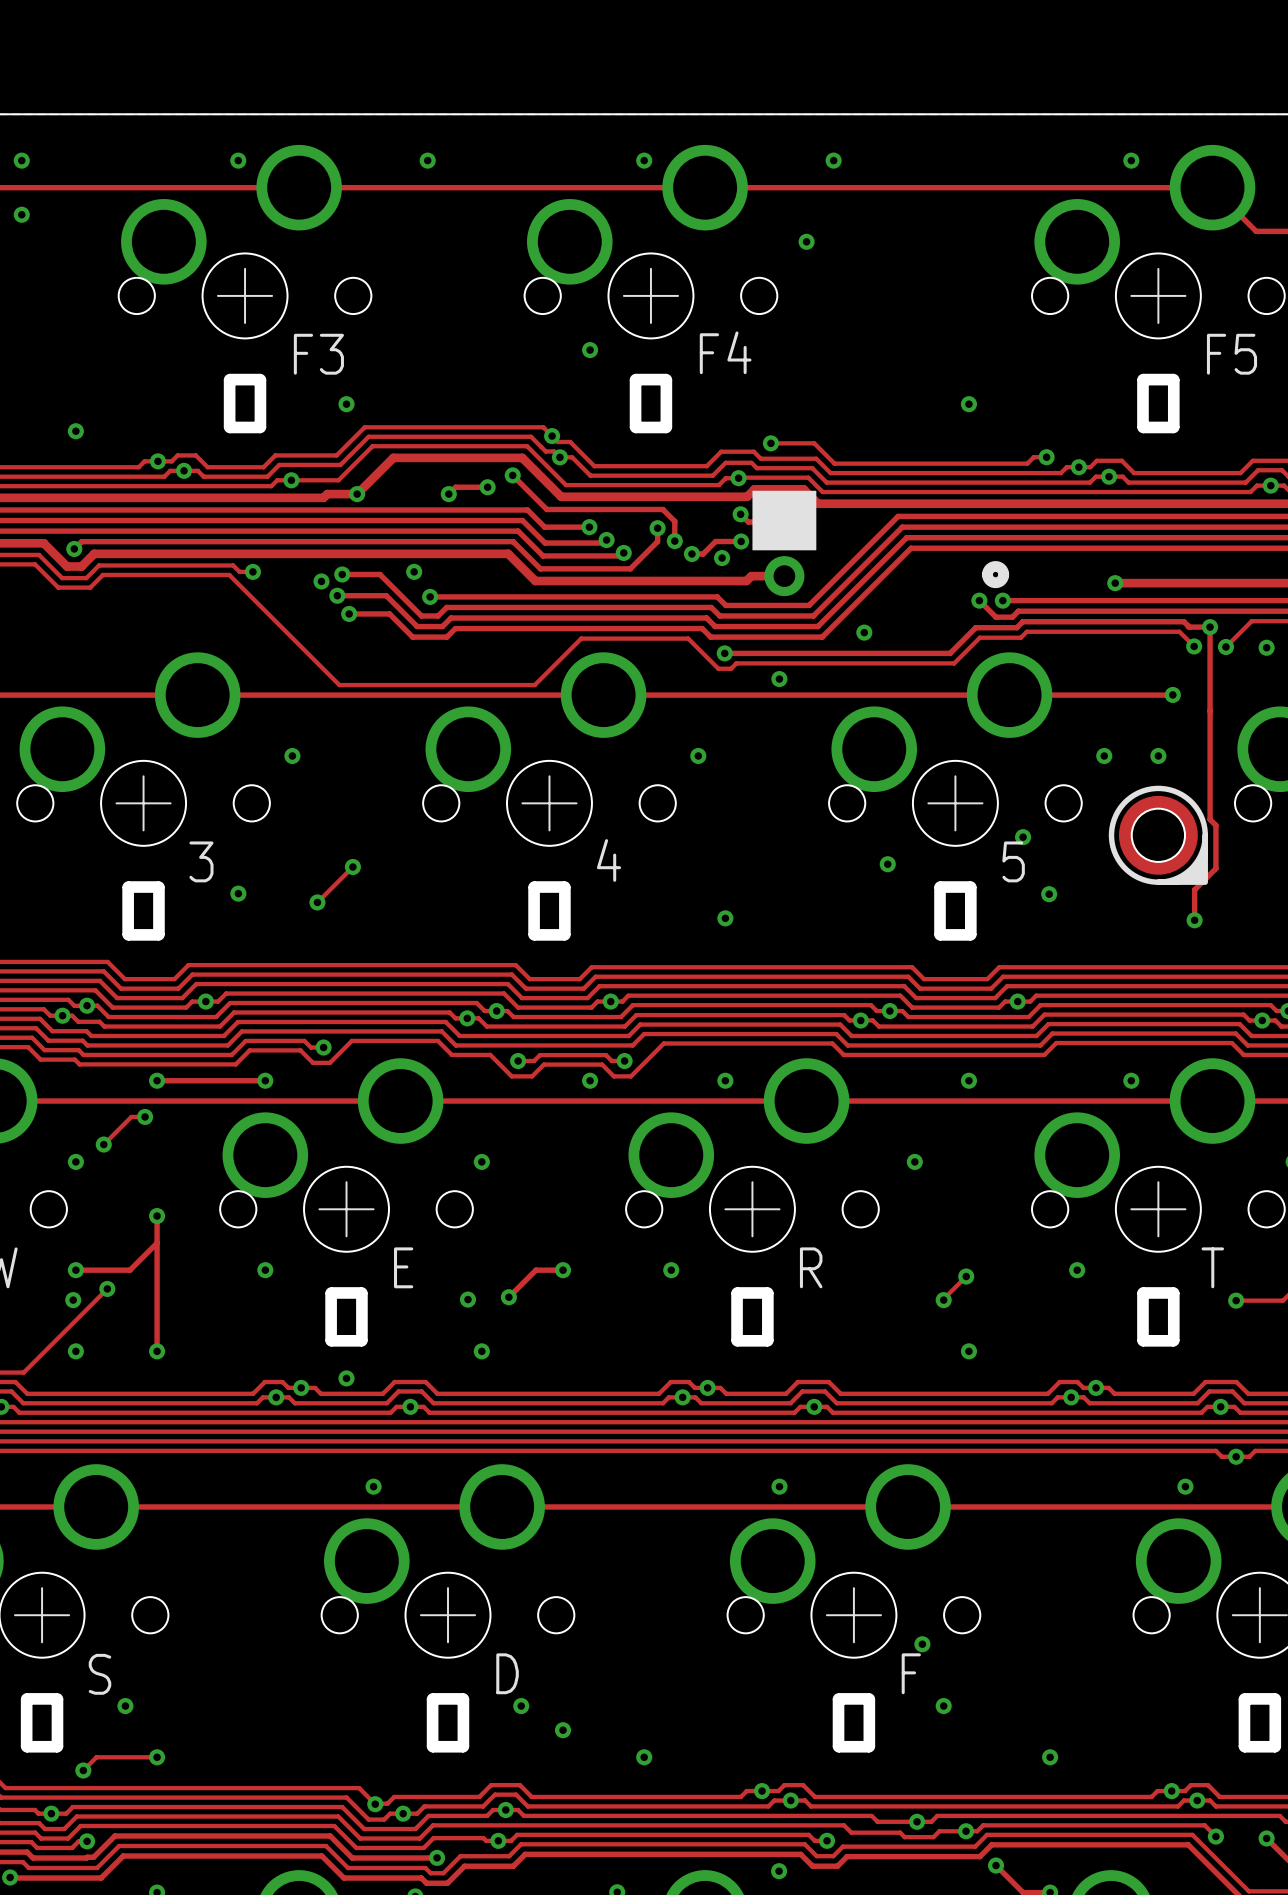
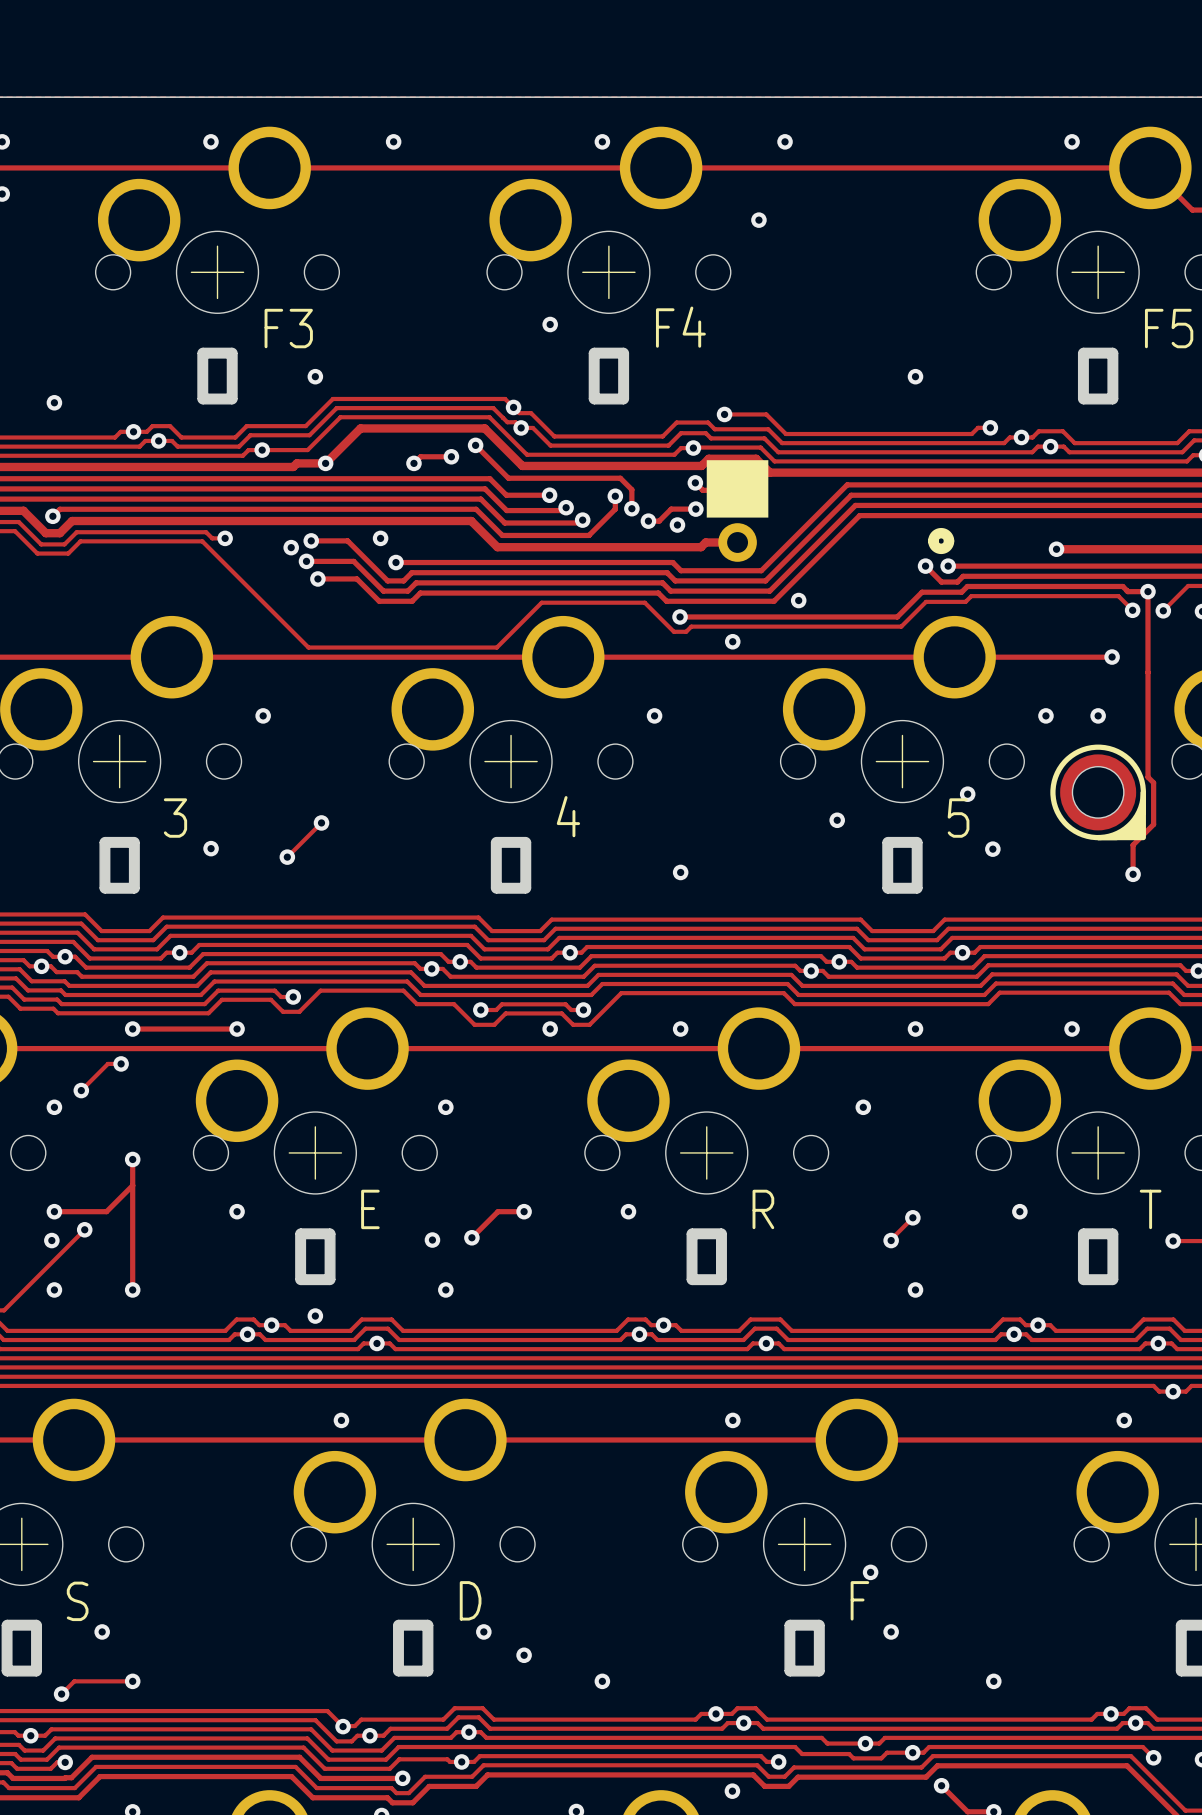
via position: (864, 632) -> (798, 600)

